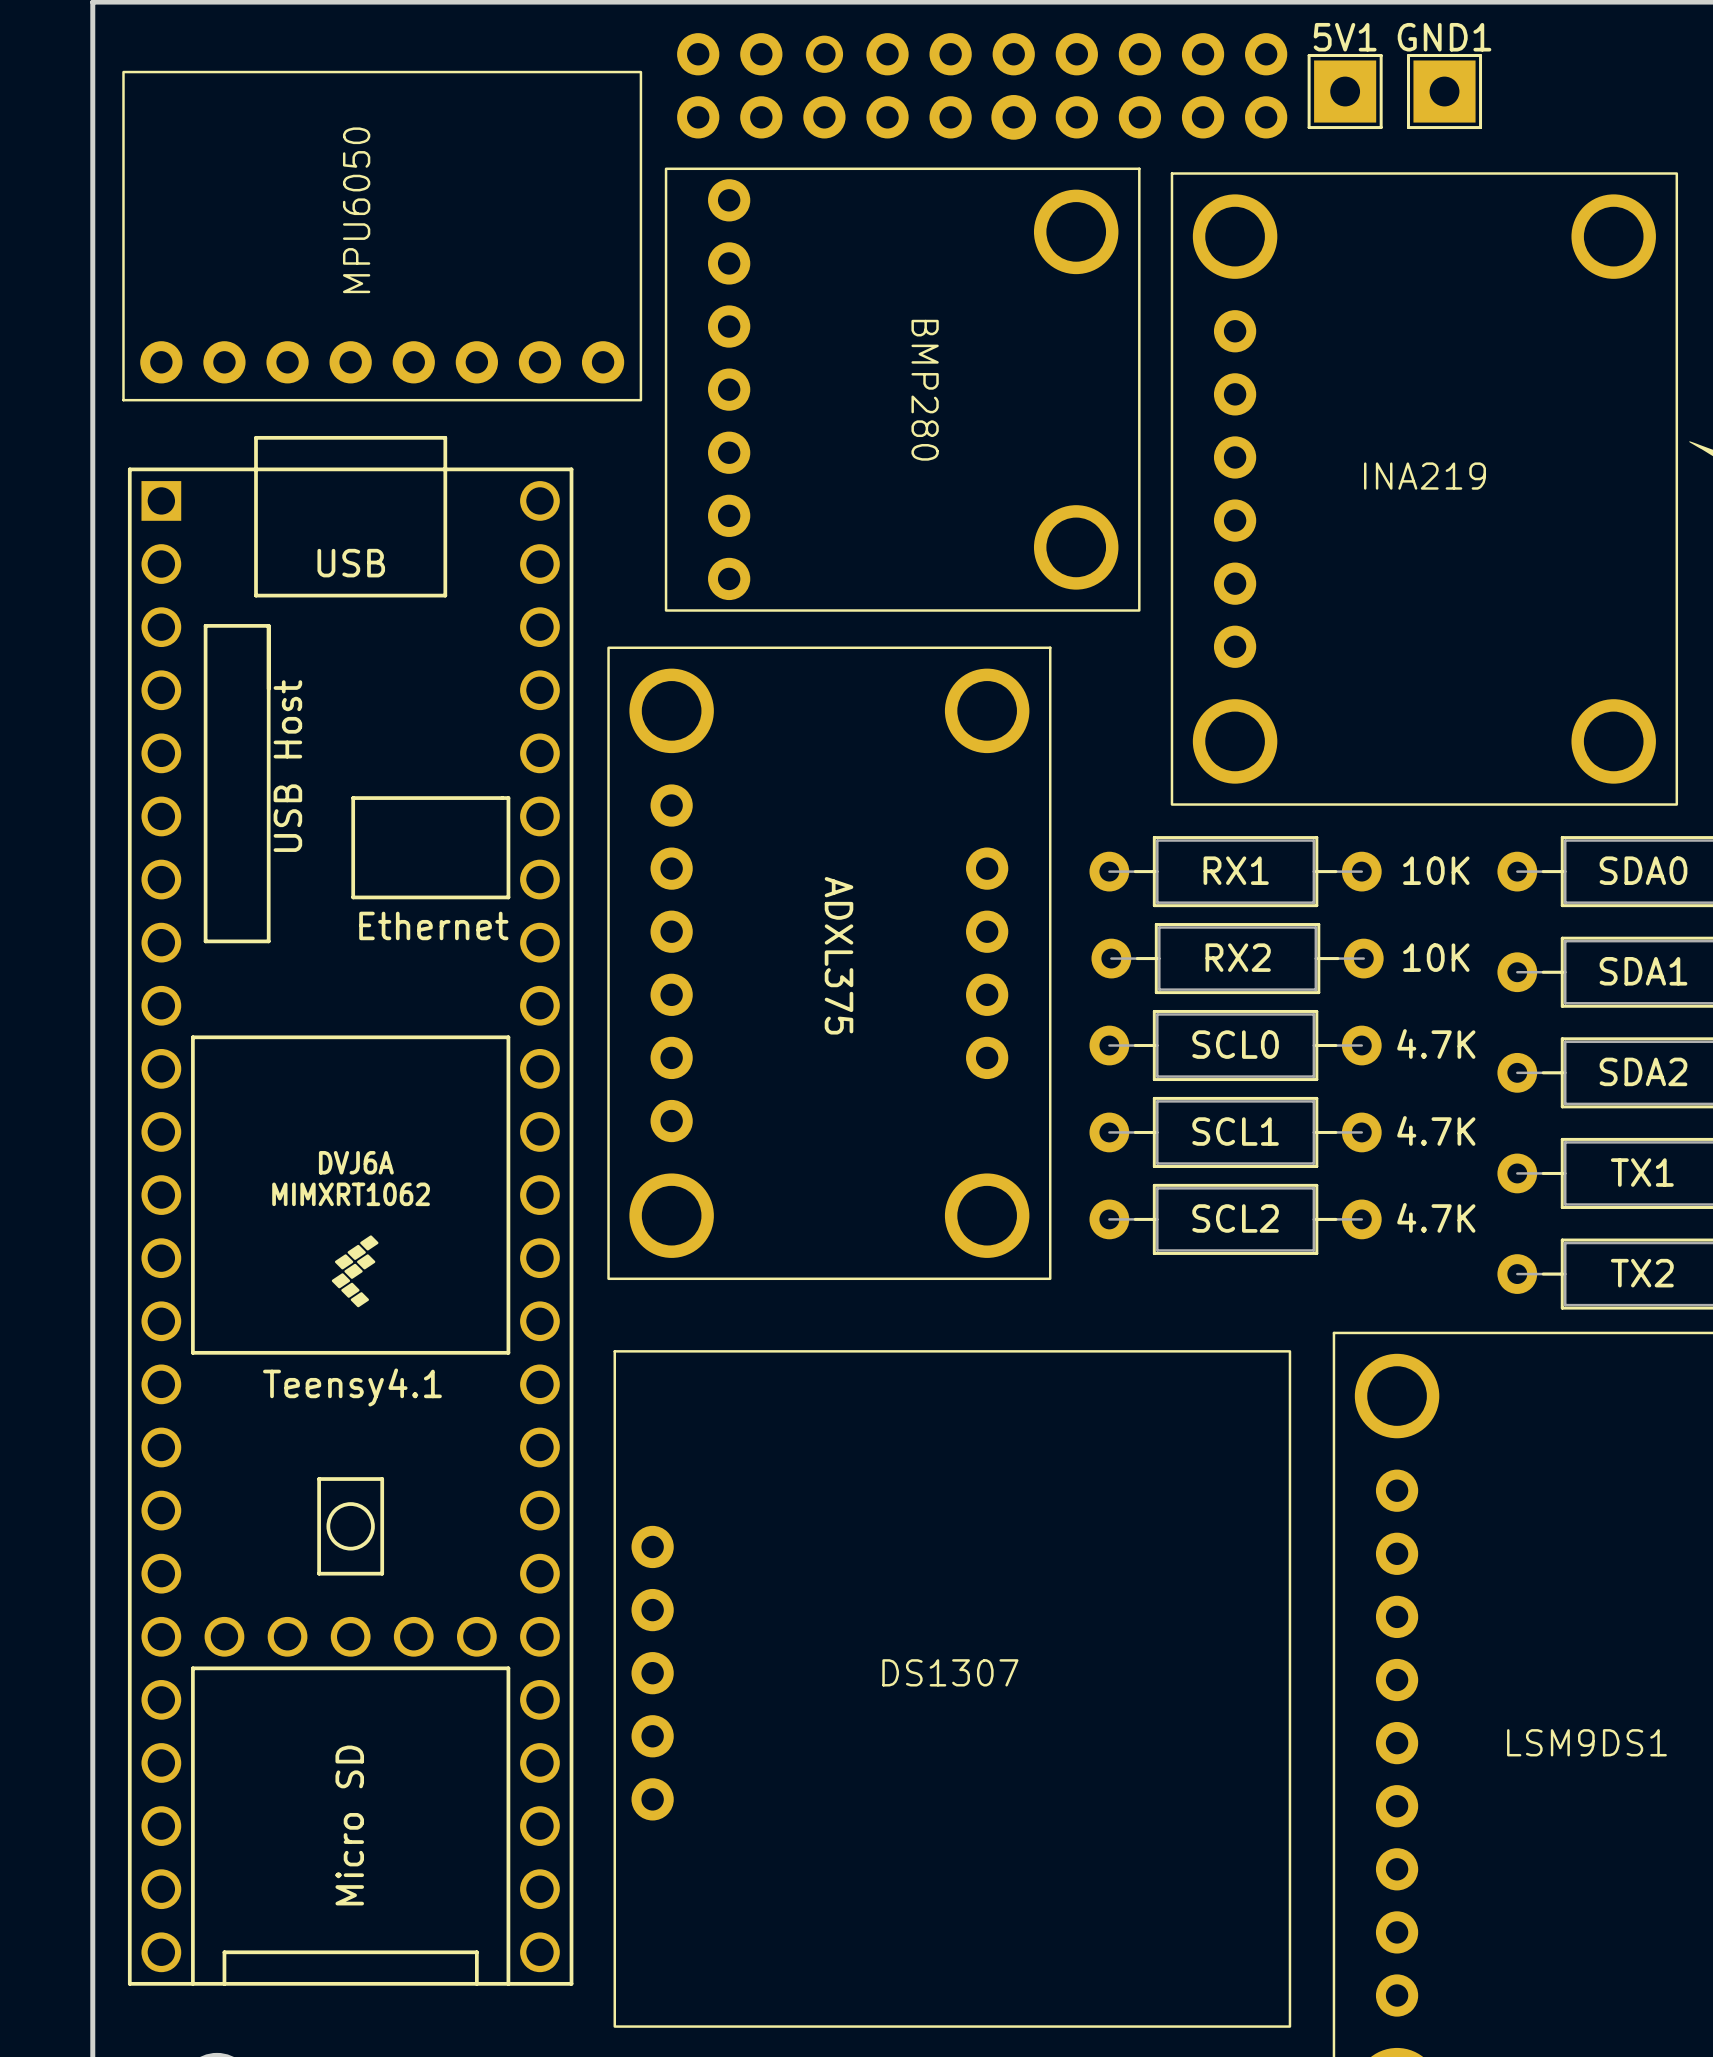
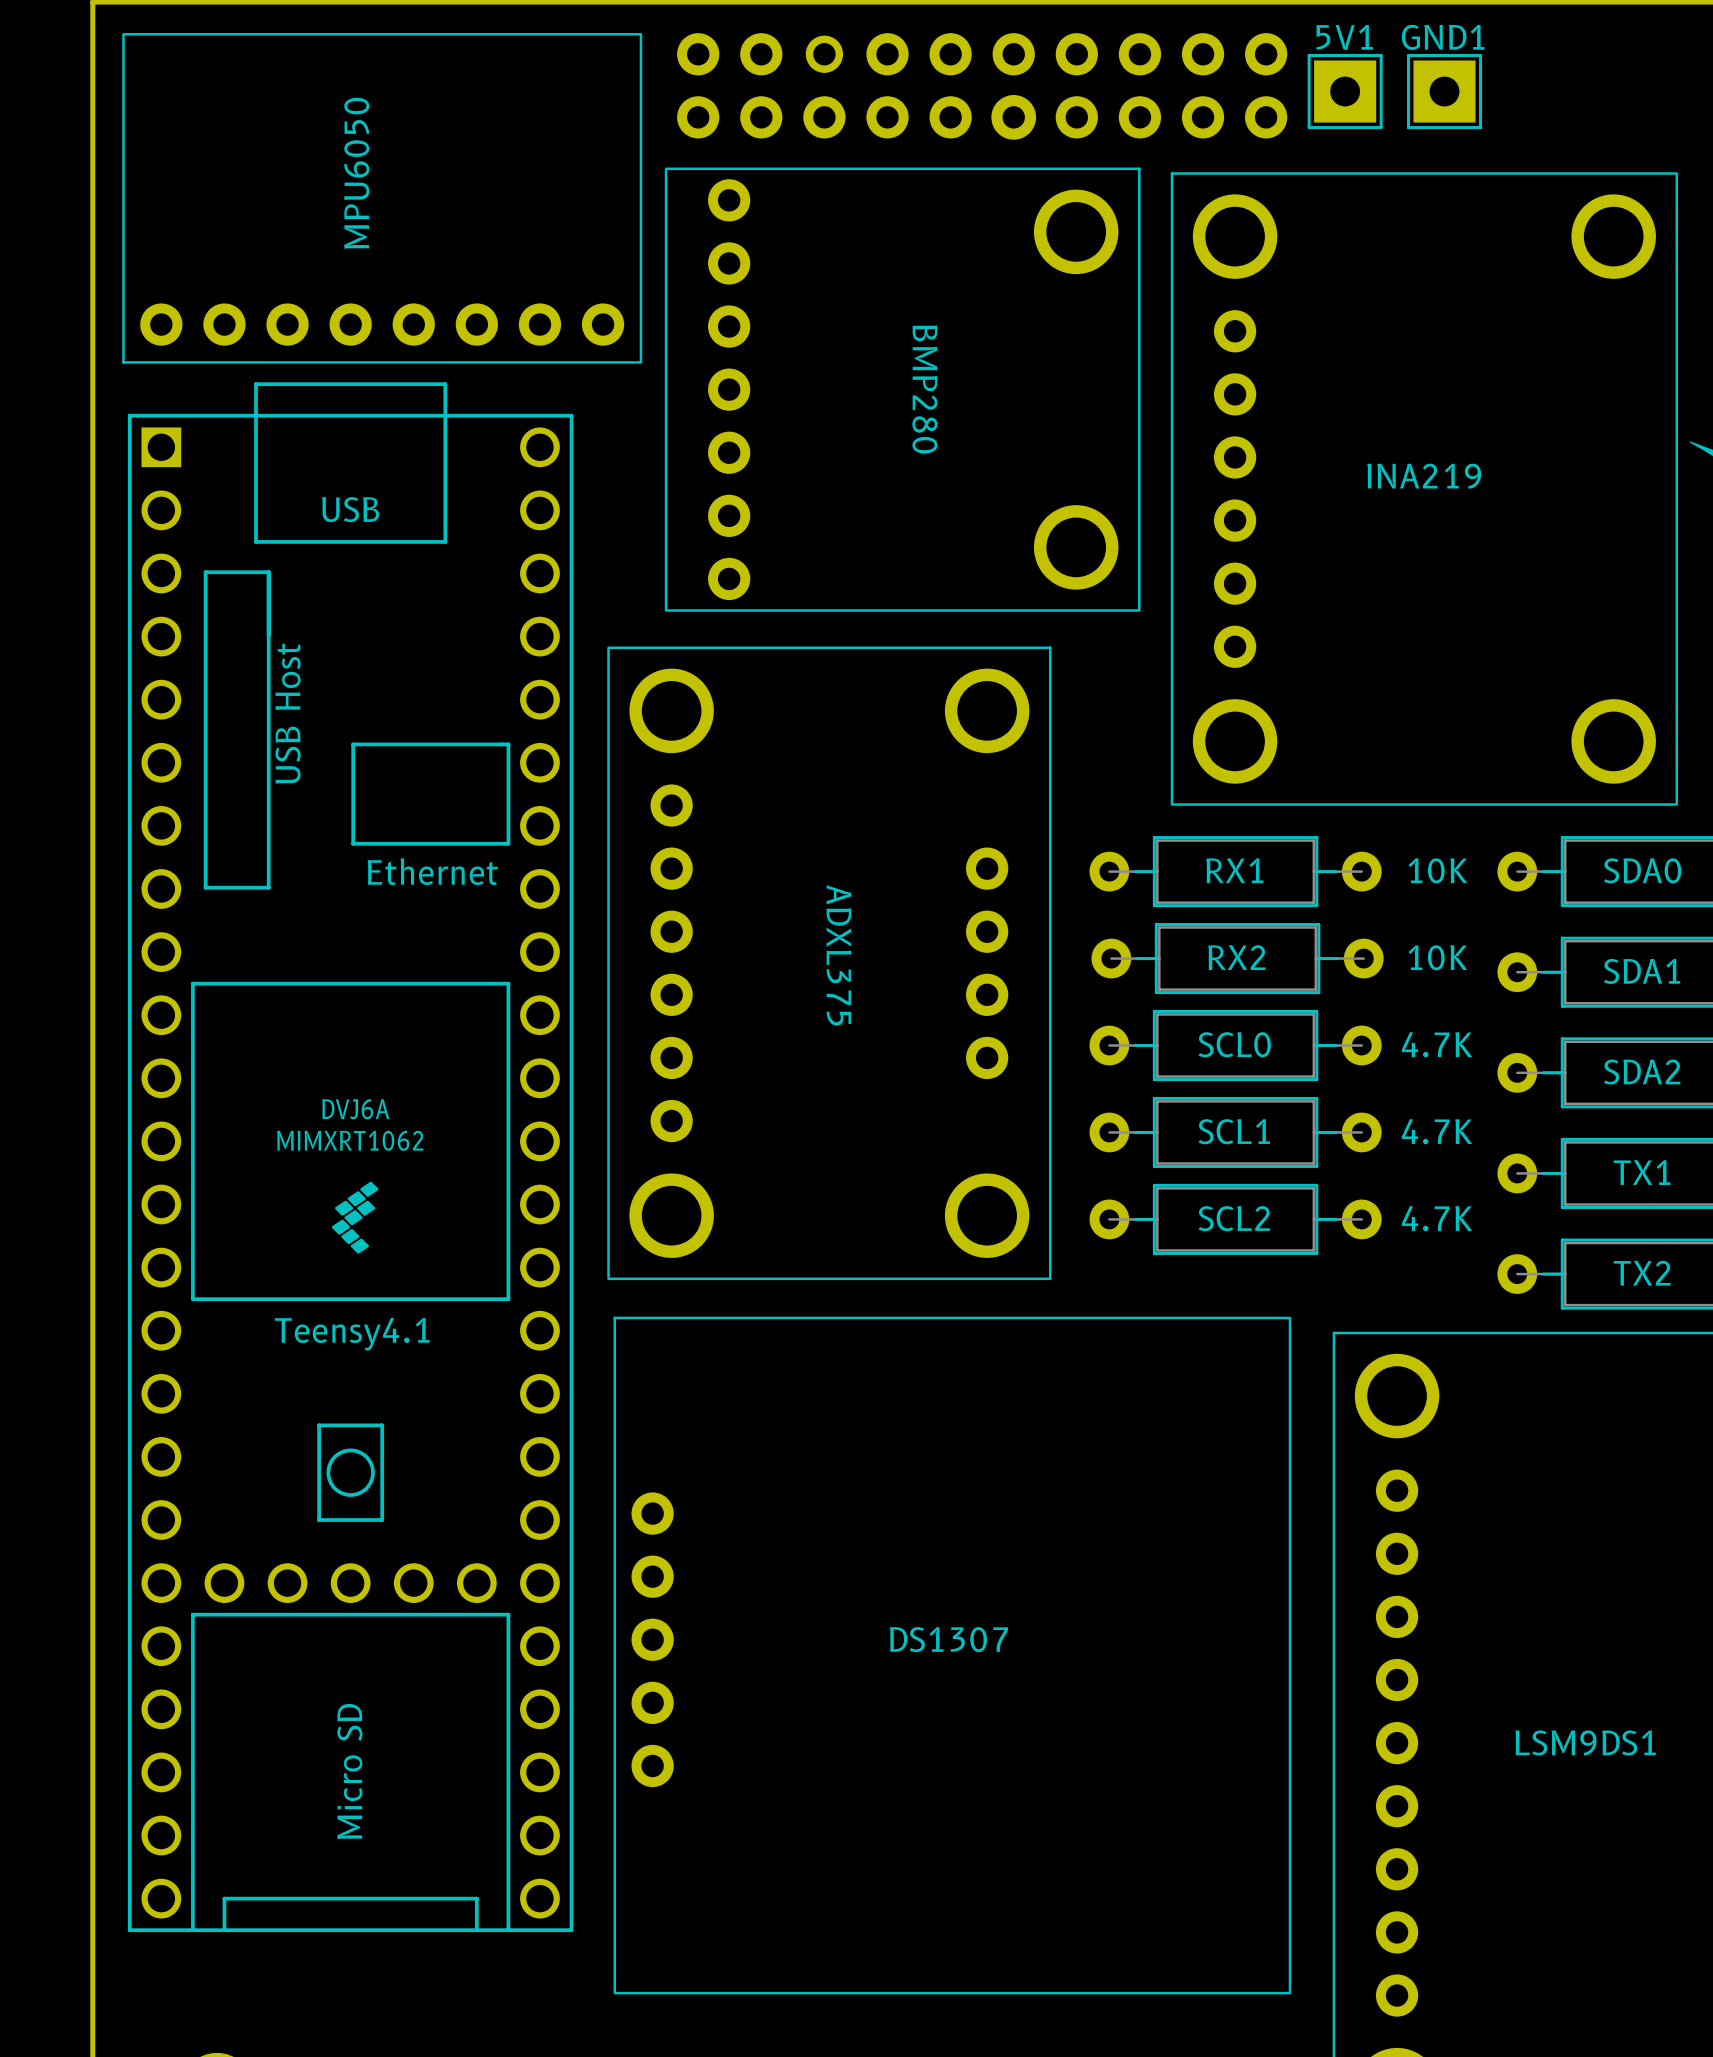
MPU6050 position: (382, 236) -> (382, 198)
part position: (350, 1210) -> (350, 1157)
DS1307 position: (952, 1688) -> (952, 1655)

